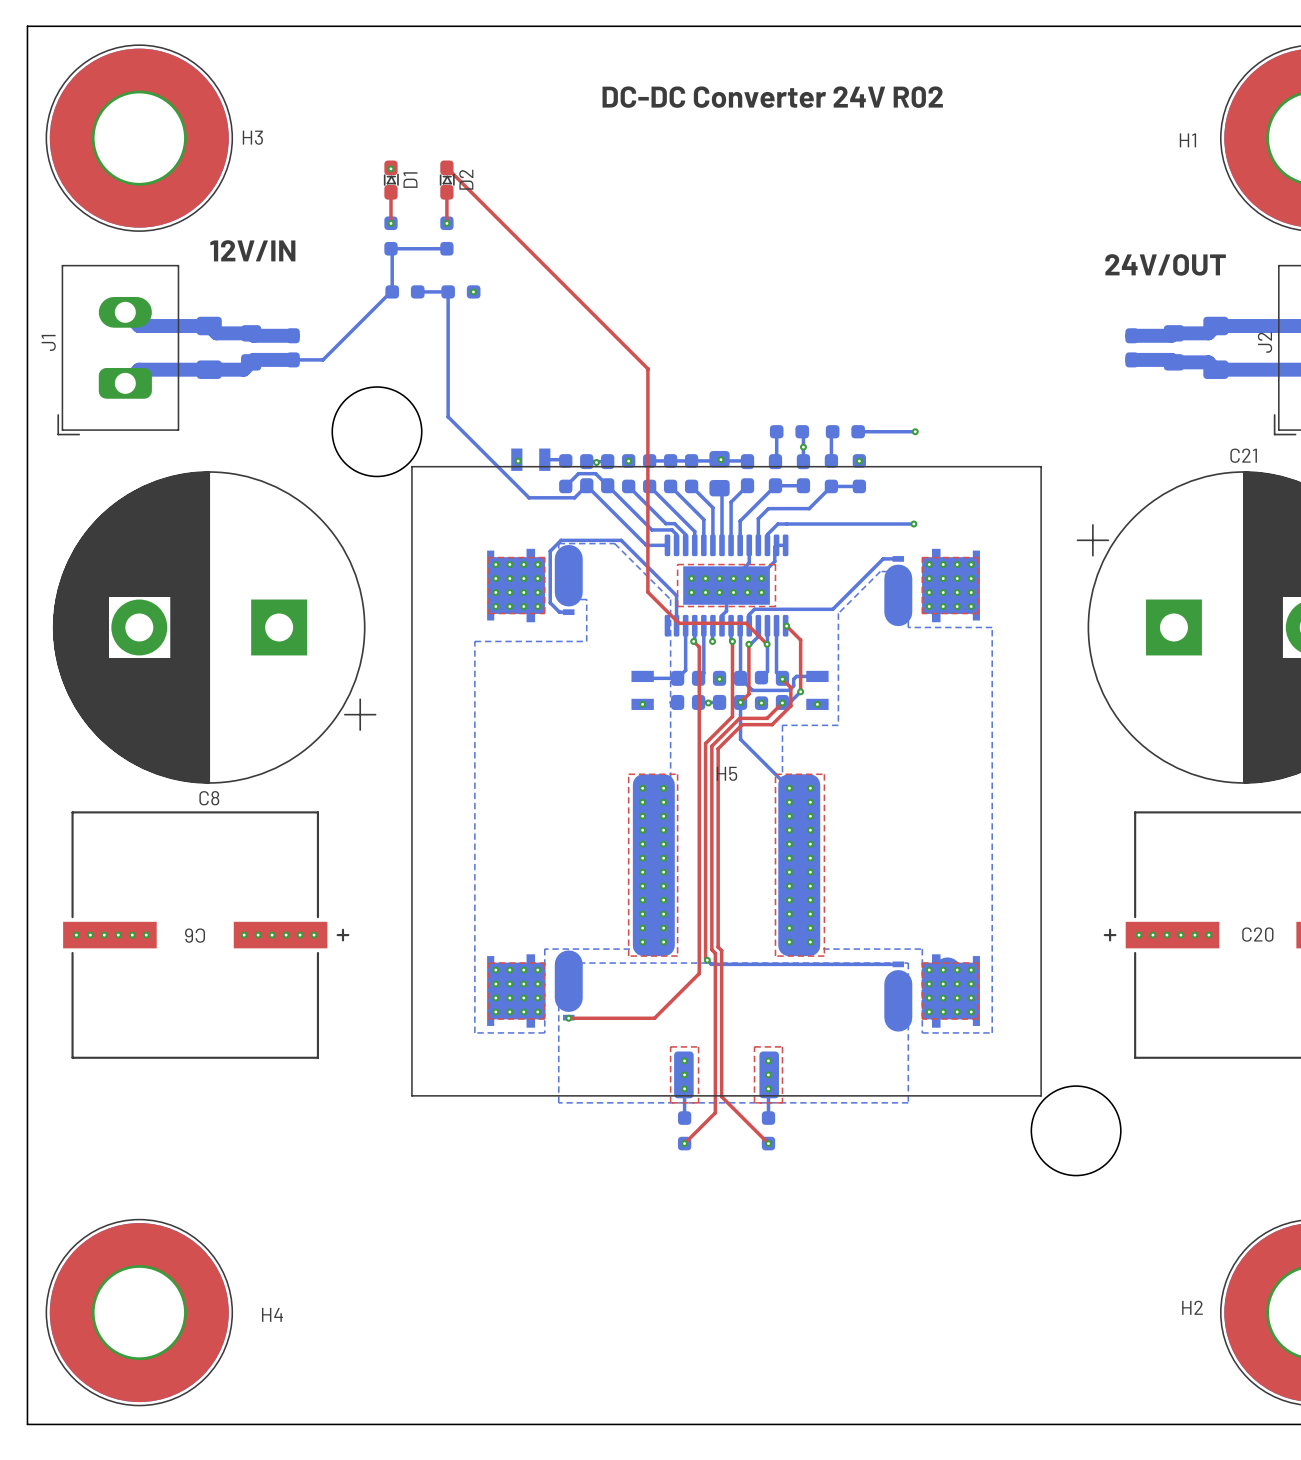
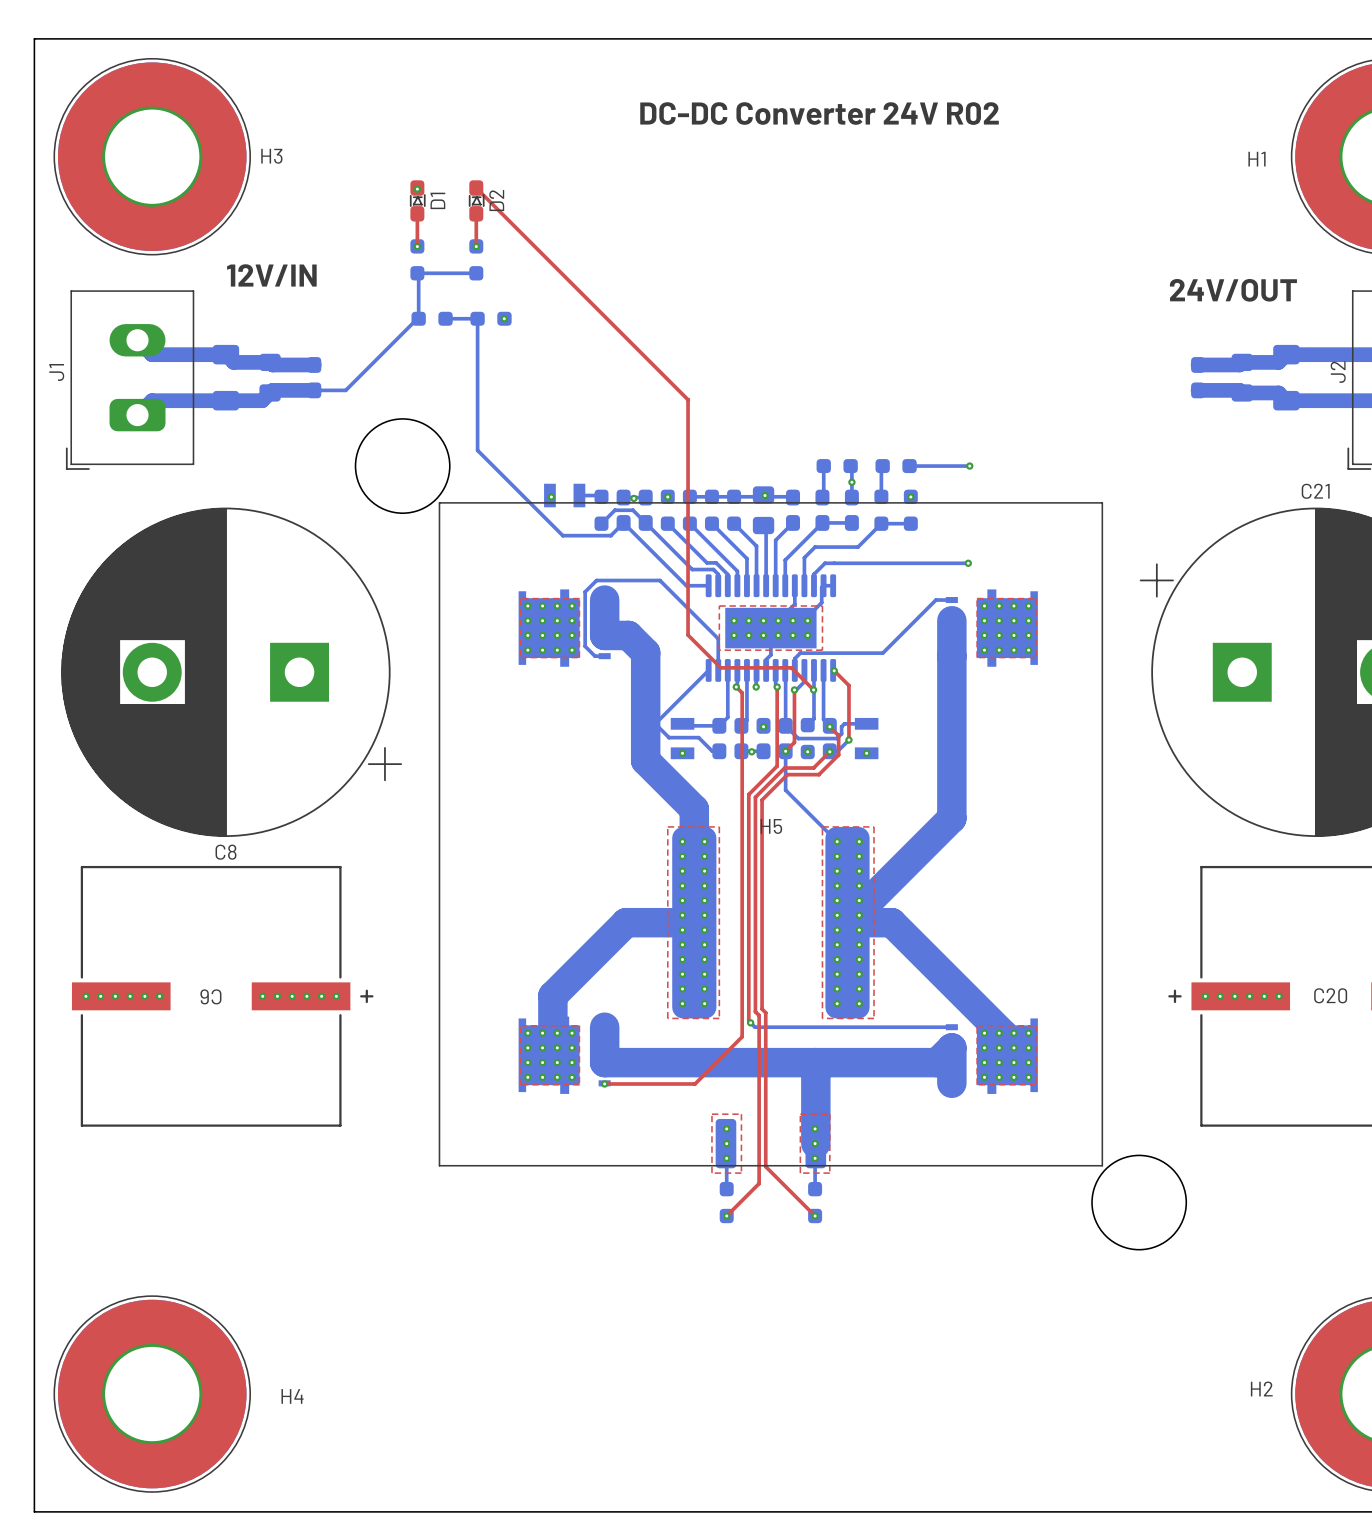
bottom zone outline: (558, 543) (614, 543) (670, 599) (670, 949) (544, 949) (544, 1032) (474, 1032) (474, 641) (586, 641) (586, 599) (558, 599) (558, 543) -> none
bottom zone outline: (880, 571) (908, 571) (908, 627) (992, 627) (992, 1032) (922, 1032) (922, 949) (782, 949) (782, 725) (838, 725) (838, 613) (880, 571) -> none
bottom track: none -> (604, 635) (628, 635) (645, 652) (645, 760) (694, 809) (694, 922) (626, 922) (552, 995) (552, 1055)
bottom track: none -> (951, 656) (951, 818) (847, 922) (891, 922) (1003, 1034)
bottom track: none -> (708, 670) (655, 723) (669, 737) (698, 737) (712, 751)
bottom zone outline: (558, 963) (558, 1102) (908, 1102) (908, 963) (558, 963) -> none
bottom track: none -> (951, 1047) (937, 1062) (604, 1062)
bottom track: none -> (815, 1062) (815, 1143)

